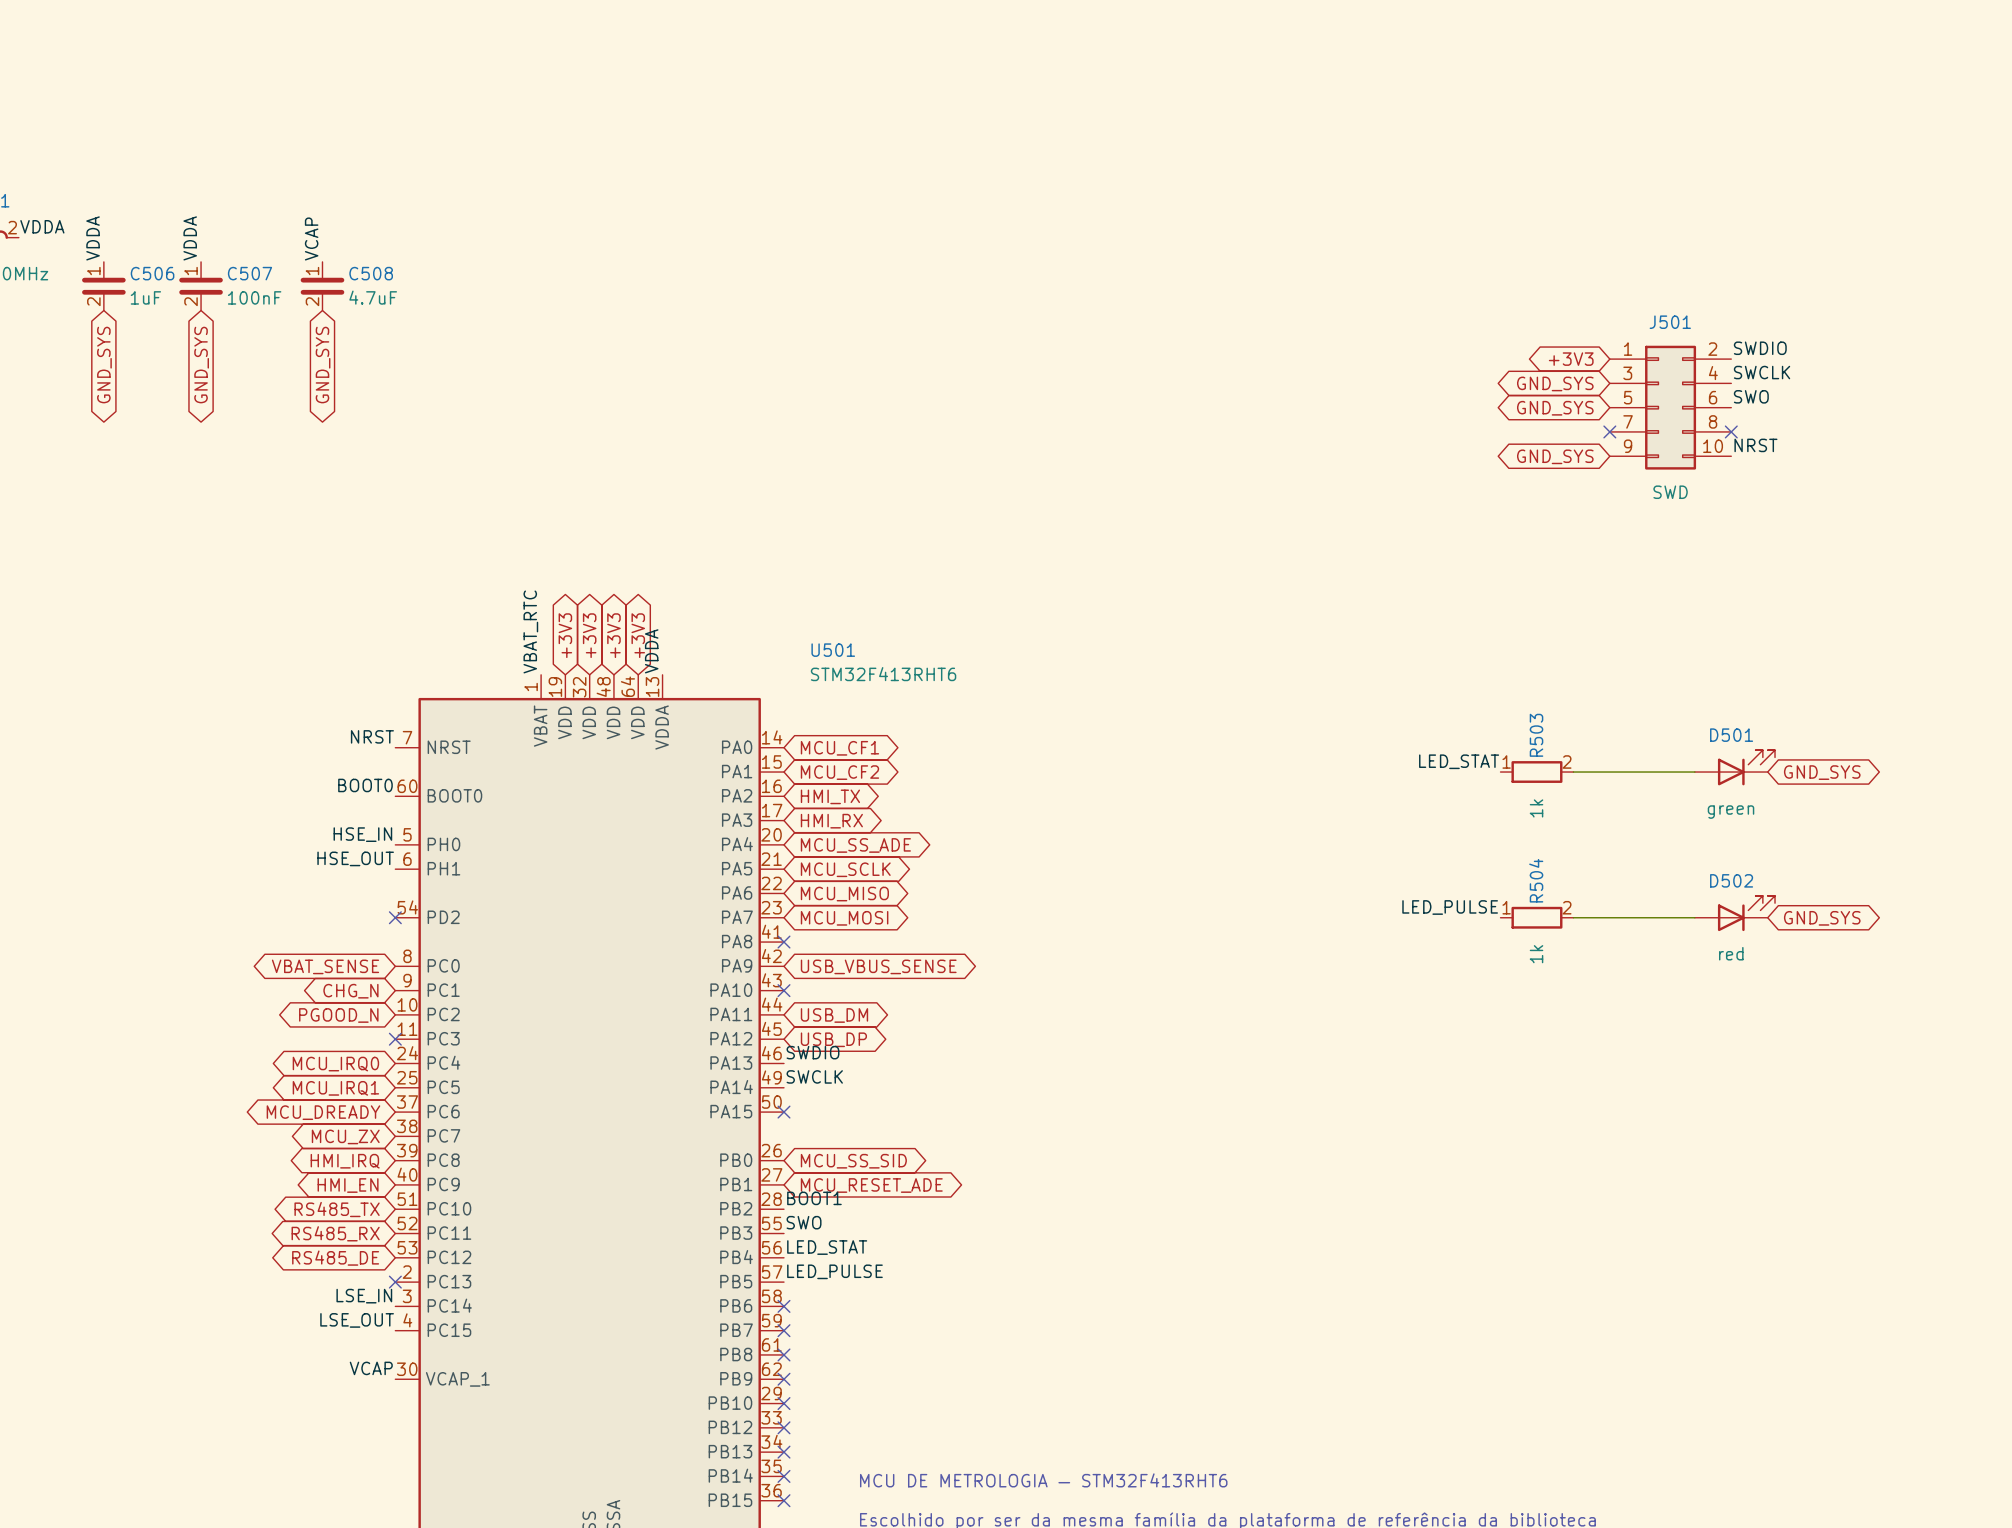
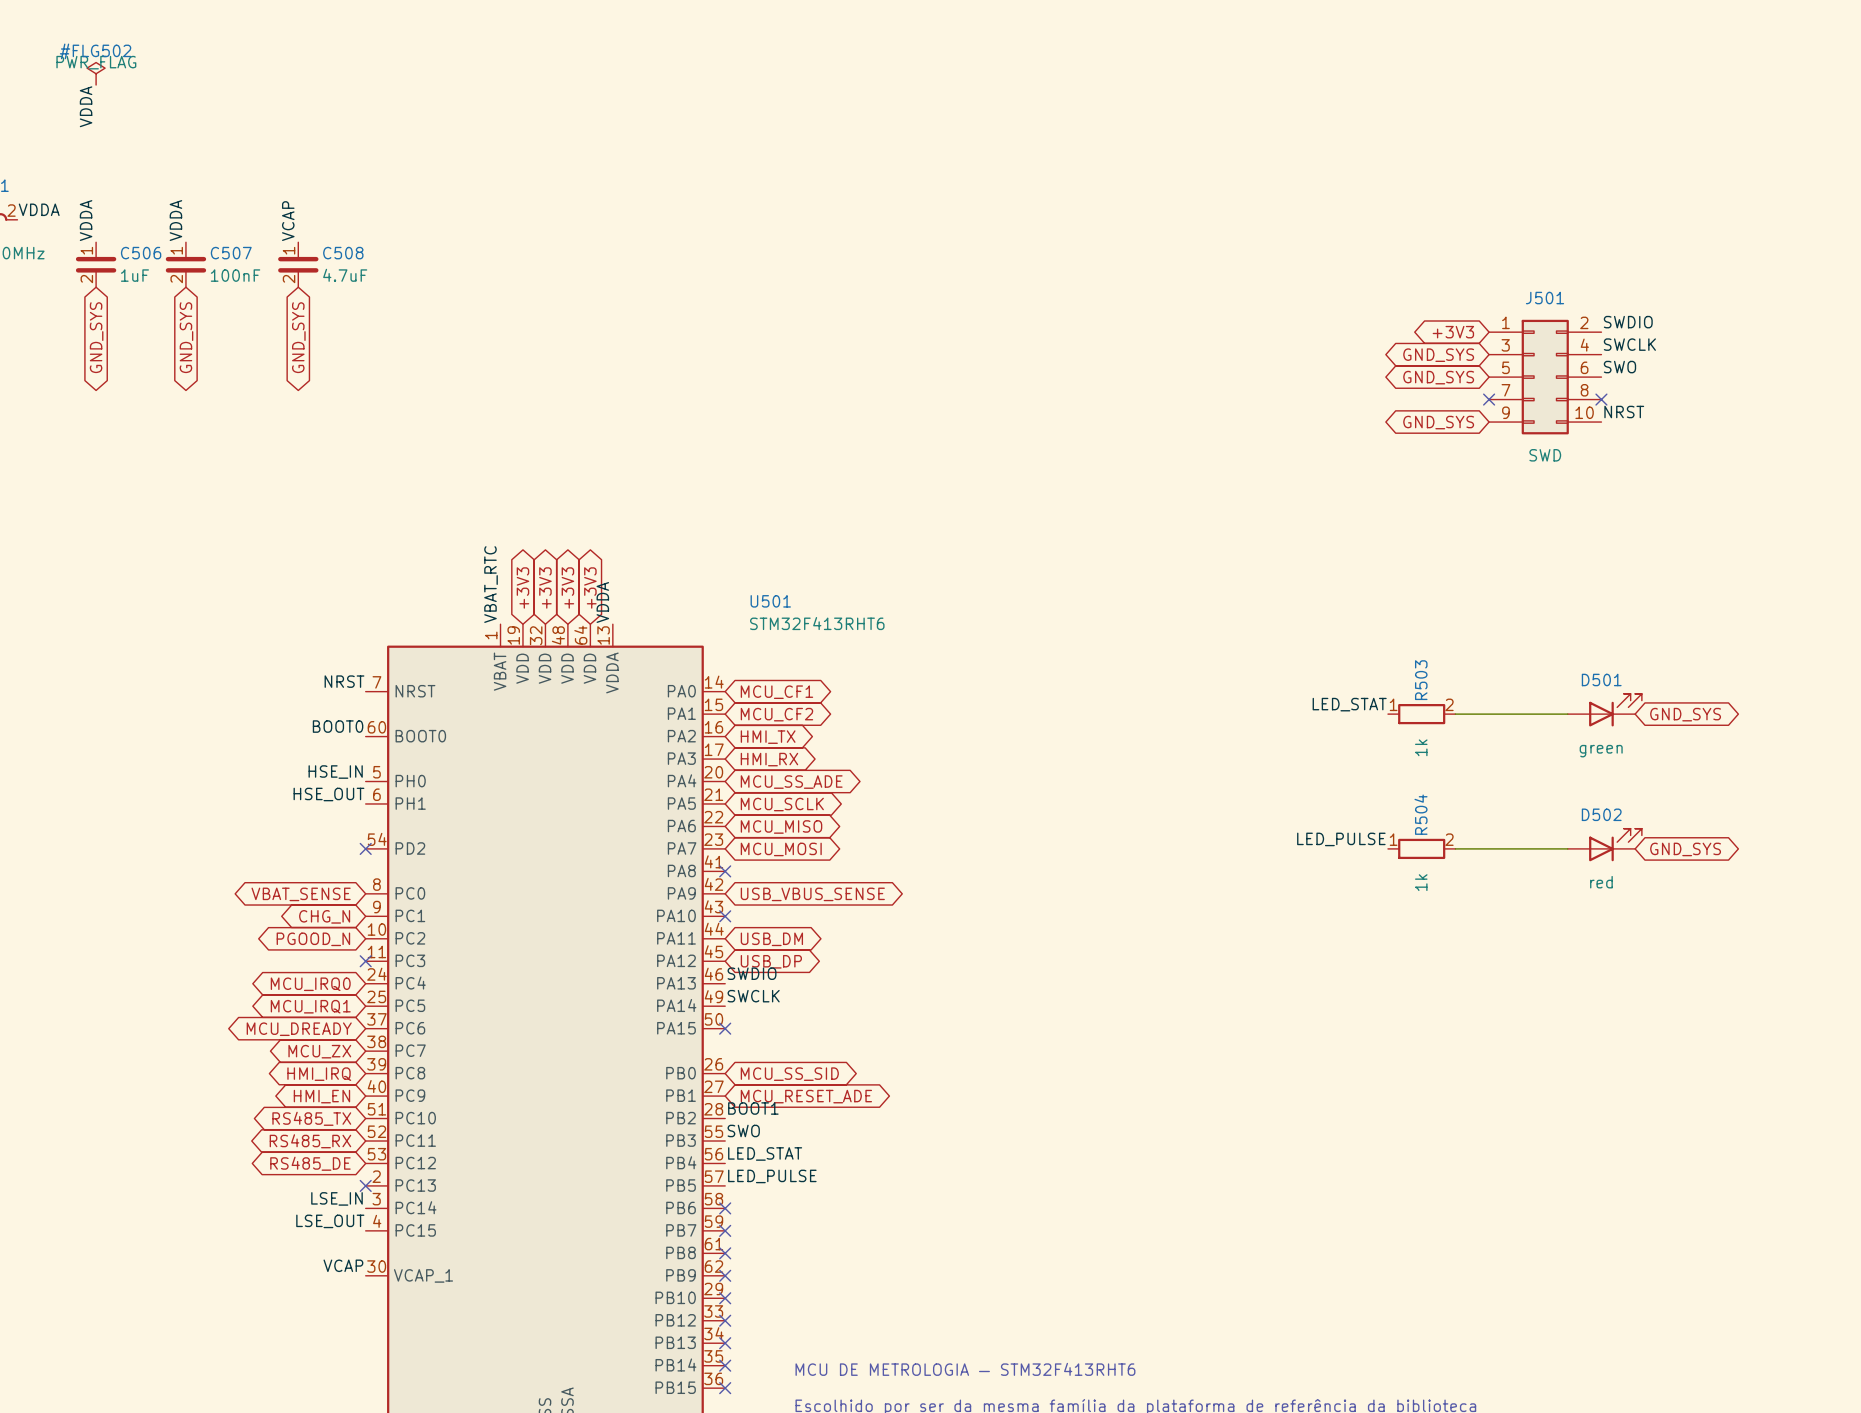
#FLG502: none -> PWR_FLAG (96, 73)
label: none -> VDDA (86, 106)

